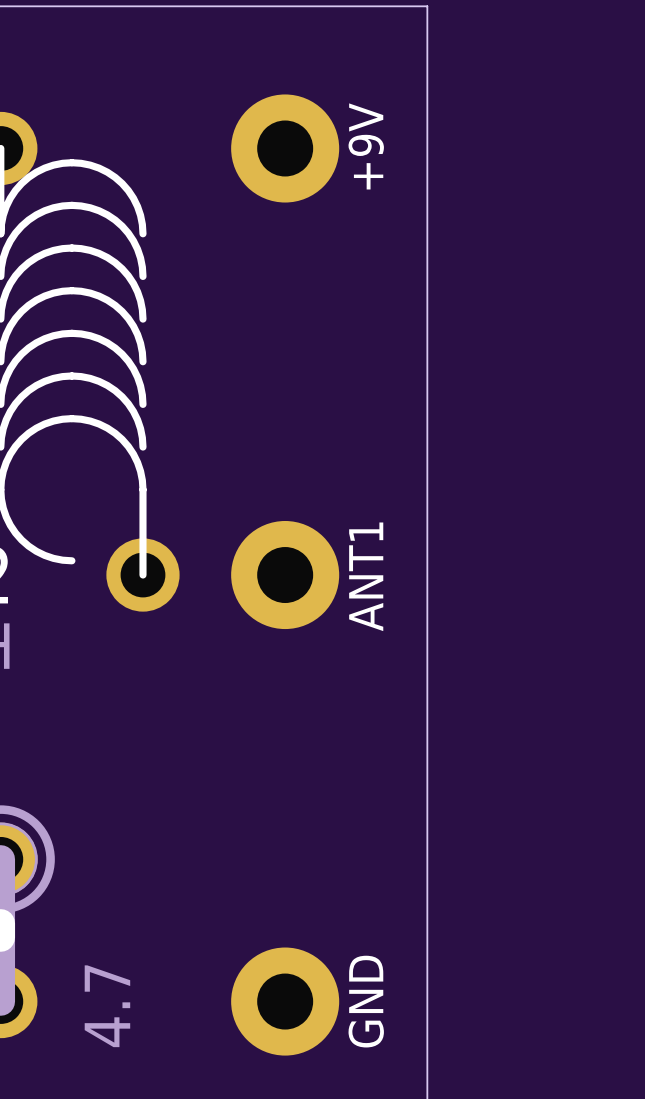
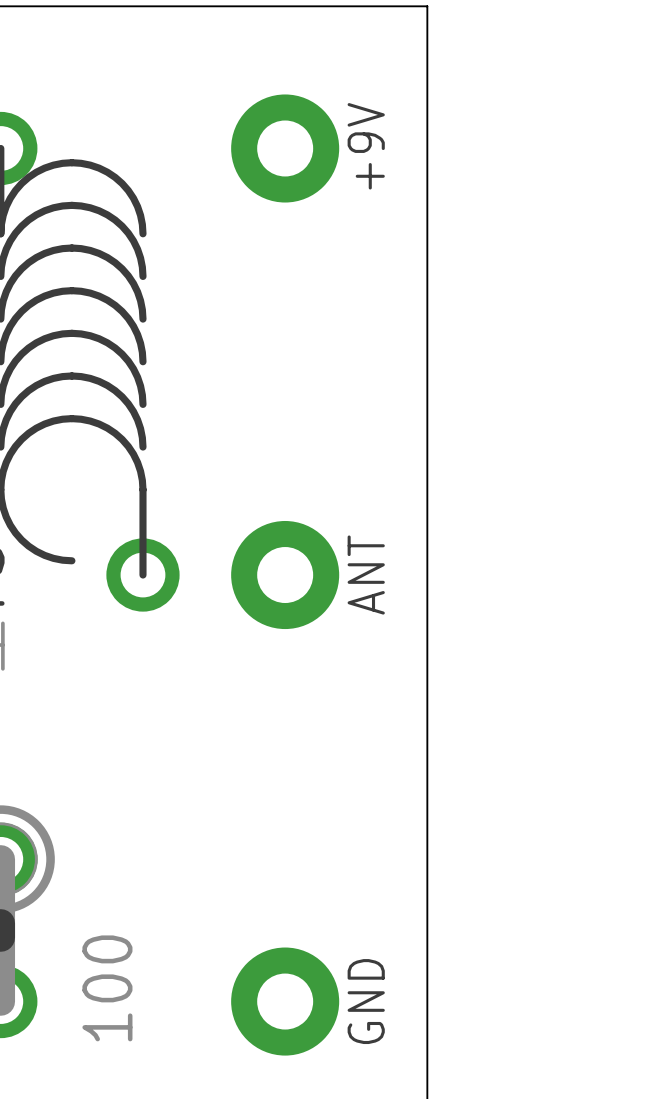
ANT1 name: ANT1 (366, 576) -> ANT (366, 575)
part value: 4.7 (107, 1006) -> 100 (107, 988)

